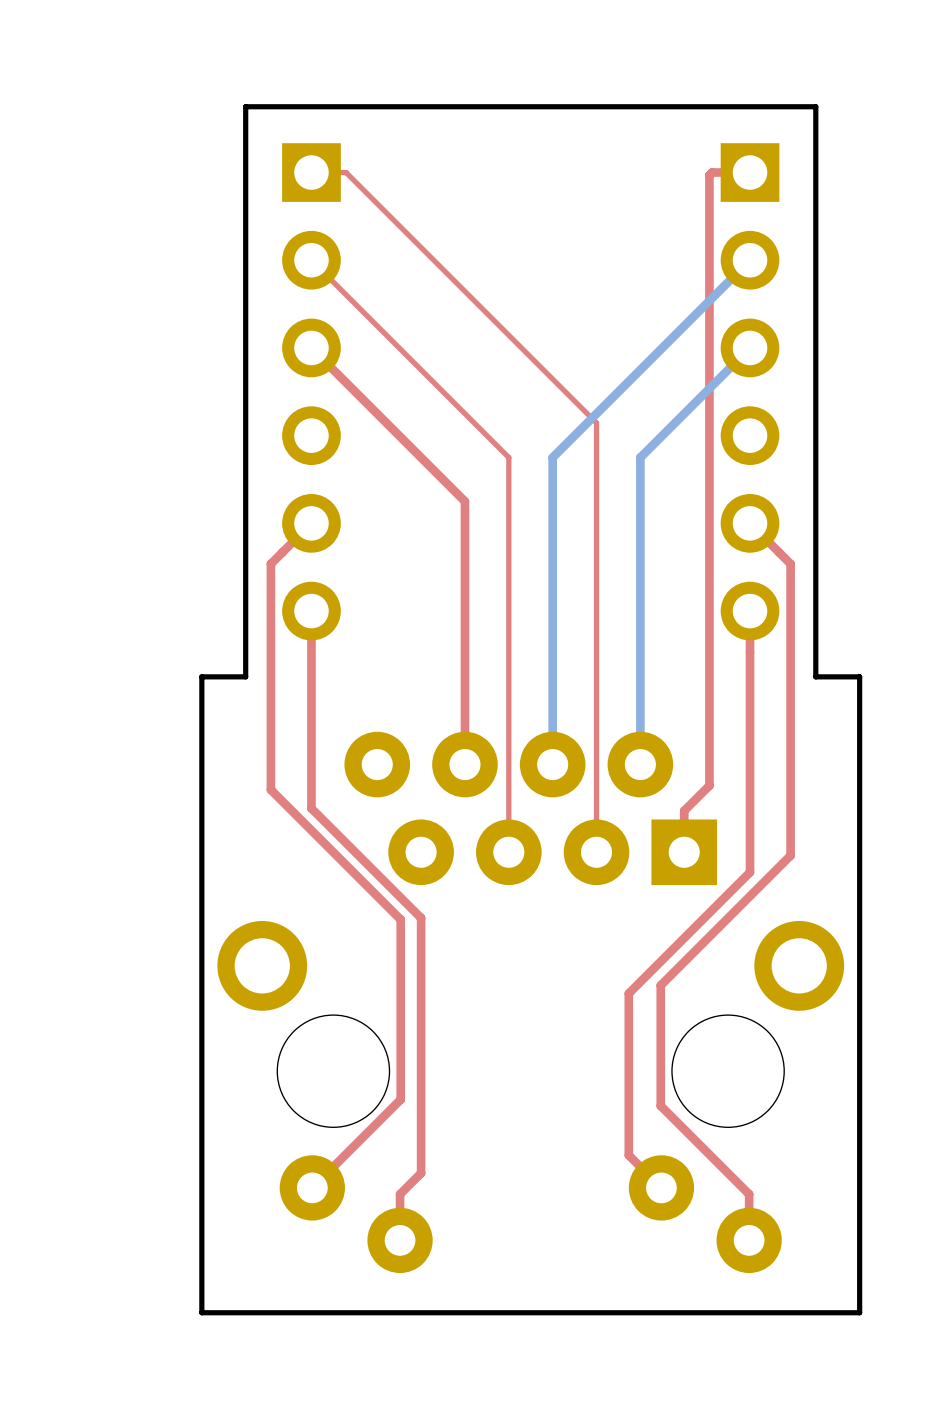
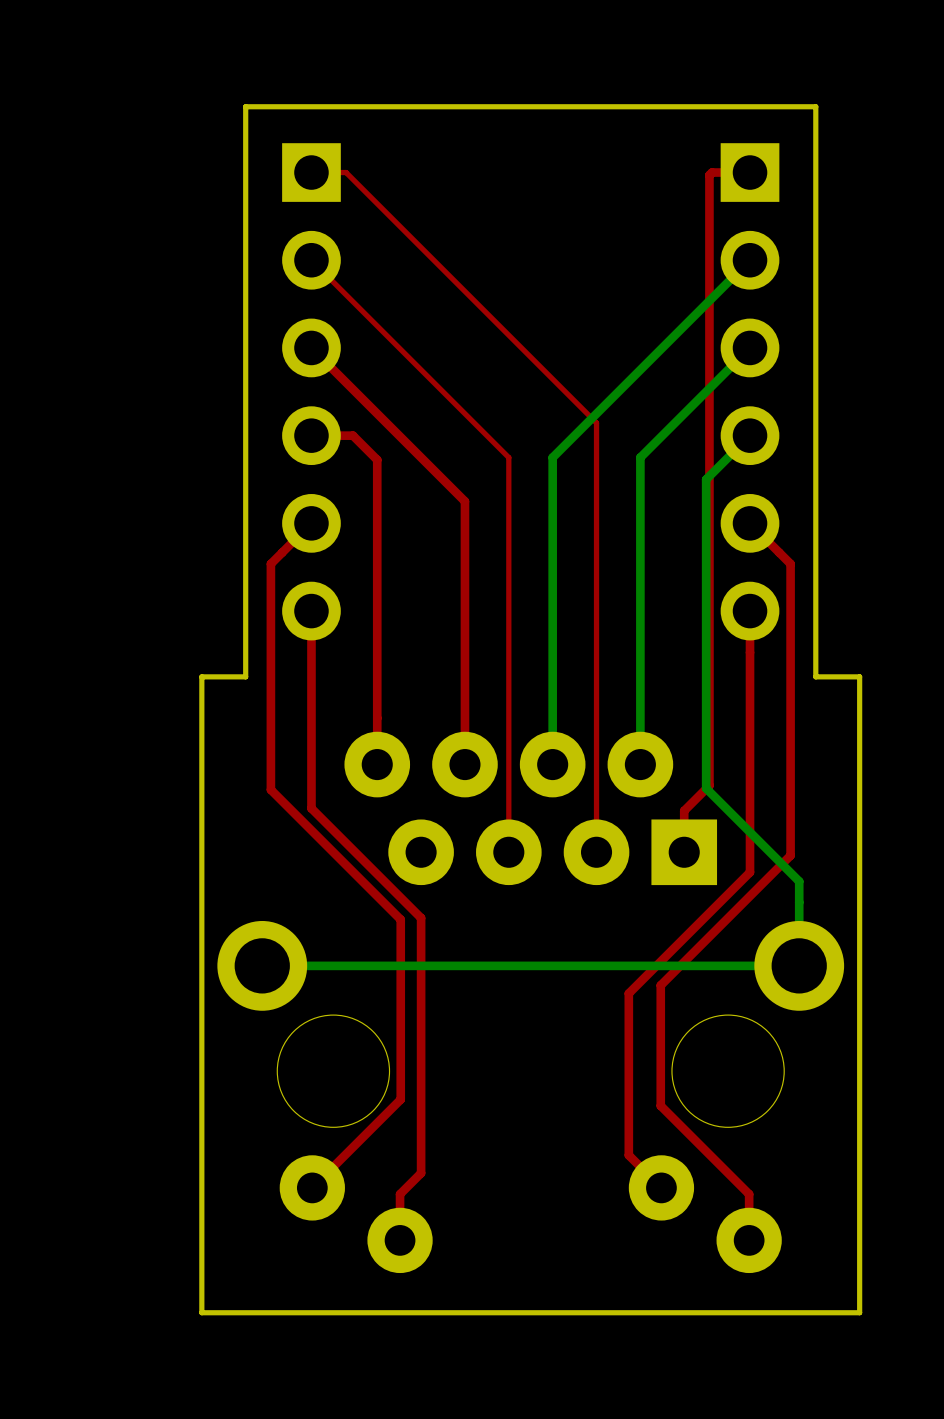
top track: none -> (311, 435) (352, 435) (377, 459) (377, 764)
bottom track: none -> (750, 435) (706, 479) (706, 788) (799, 881) (799, 965) (262, 965)

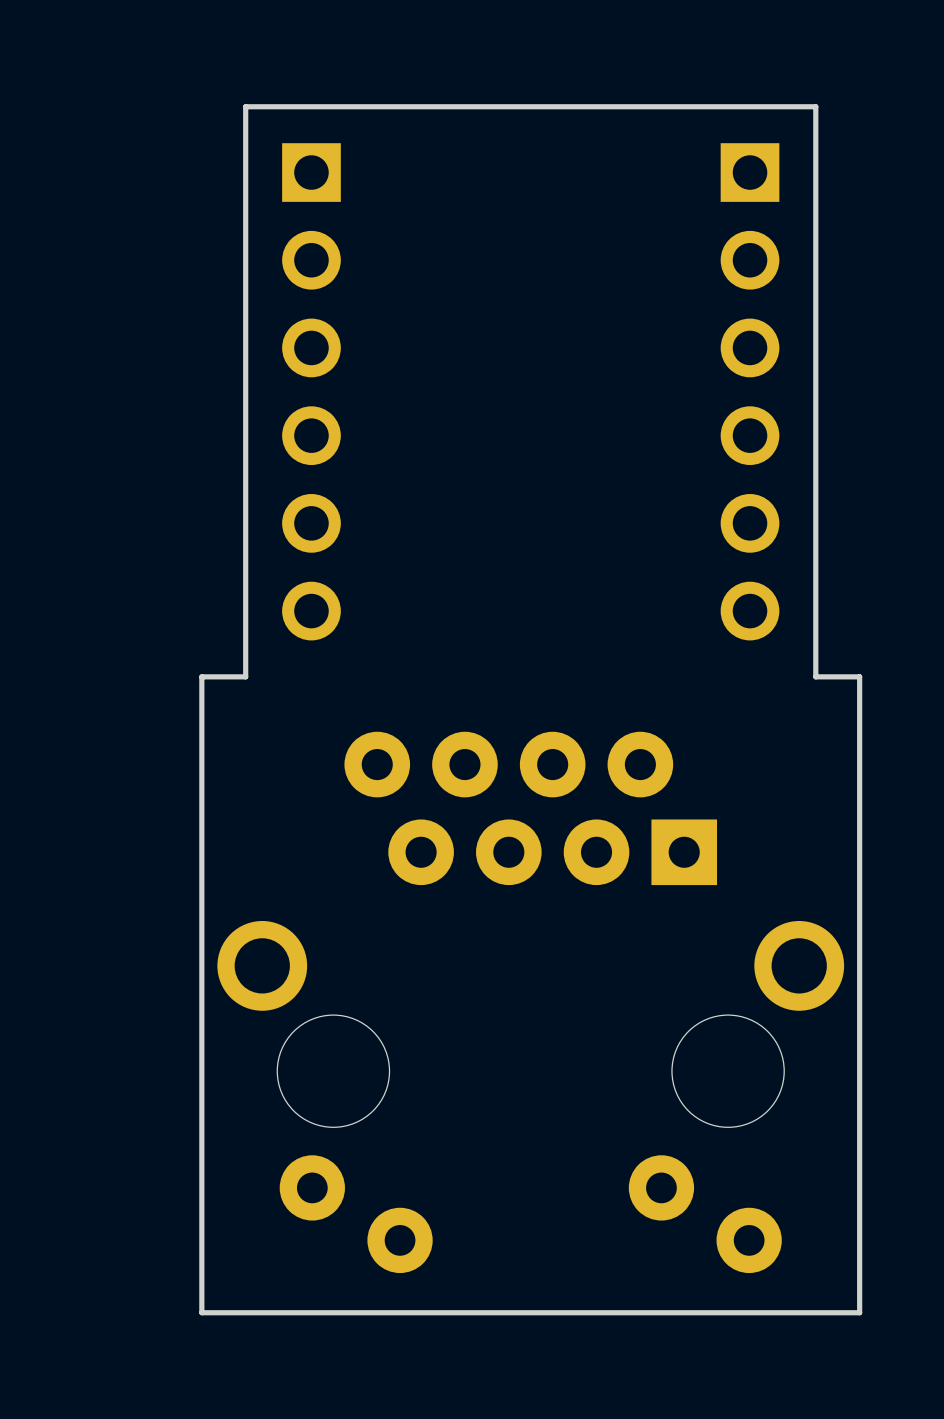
top track: (311, 172) (346, 172) (596, 422) (596, 852) -> none
top track: (750, 172) (712, 172) (709, 175) (709, 785) (684, 810) (684, 852) -> none
top track: (311, 260) (508, 457) (508, 852) -> none
bottom track: (750, 260) (552, 457) (552, 764) -> none
top track: (311, 347) (464, 501) (464, 764) -> none
bottom track: (750, 347) (640, 457) (640, 764) -> none
top track: (311, 435) (352, 435) (377, 459) (377, 764) -> none
bottom track: (750, 435) (706, 479) (706, 788) (799, 881) (799, 965) (262, 965) -> none
top track: (311, 523) (270, 563) (270, 789) (400, 919) (400, 1099) (312, 1187) -> none
top track: (750, 523) (790, 563) (790, 855) (660, 985) (660, 1105) (749, 1194) (749, 1240) -> none
top track: (311, 611) (311, 808) (421, 918) (421, 1173) (400, 1194) (400, 1240) -> none
top track: (750, 611) (750, 872) (628, 993) (628, 1155) (661, 1187) -> none

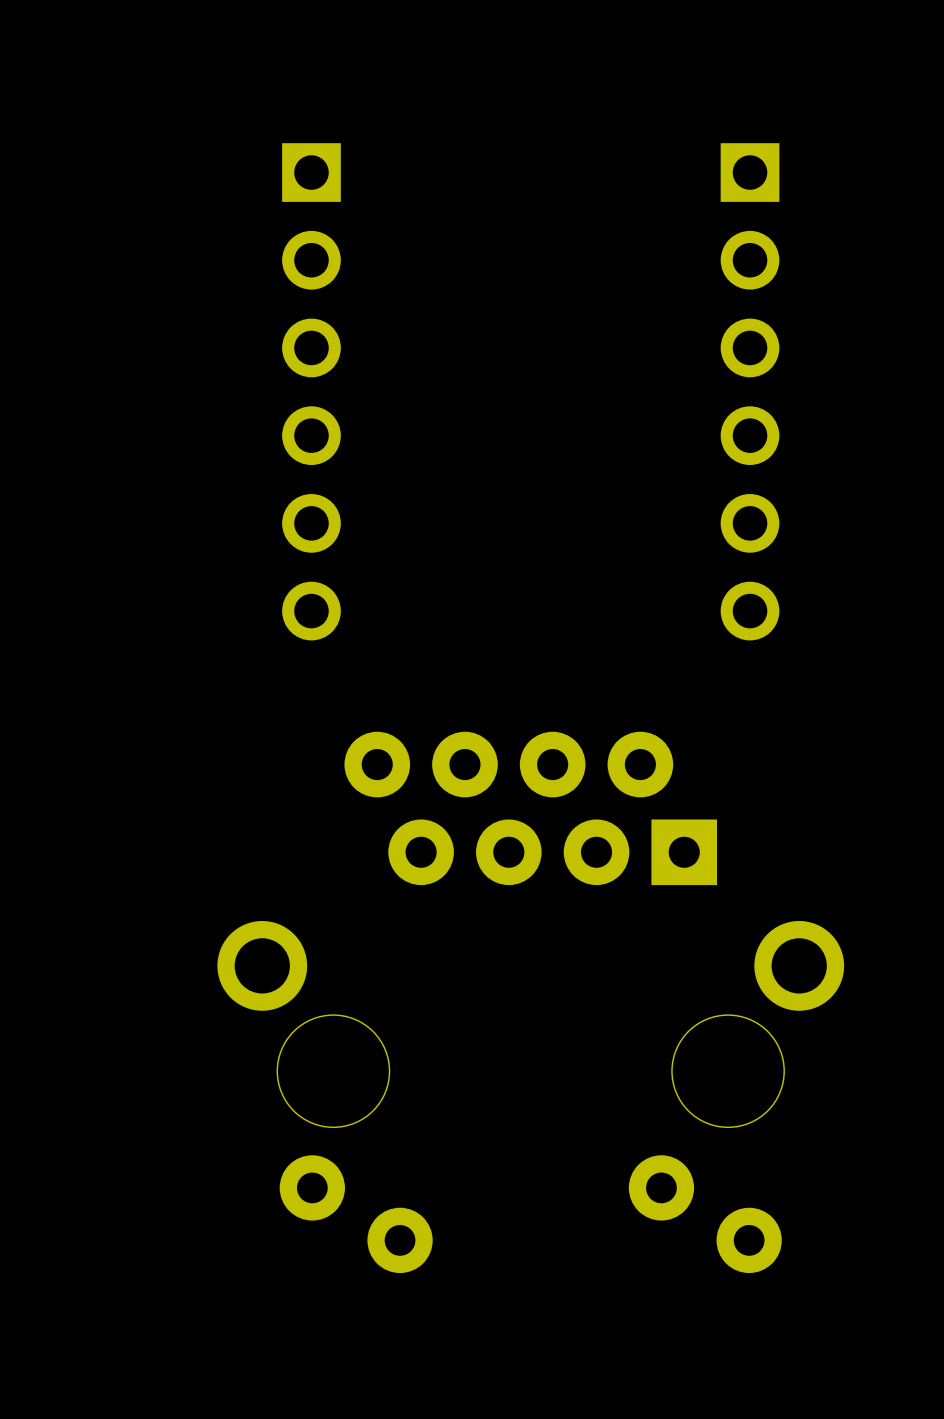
board edge: (815, 106) (815, 676) (859, 676) (859, 1312) (201, 1312) (201, 676) (245, 676) (245, 106) (815, 106) -> none

